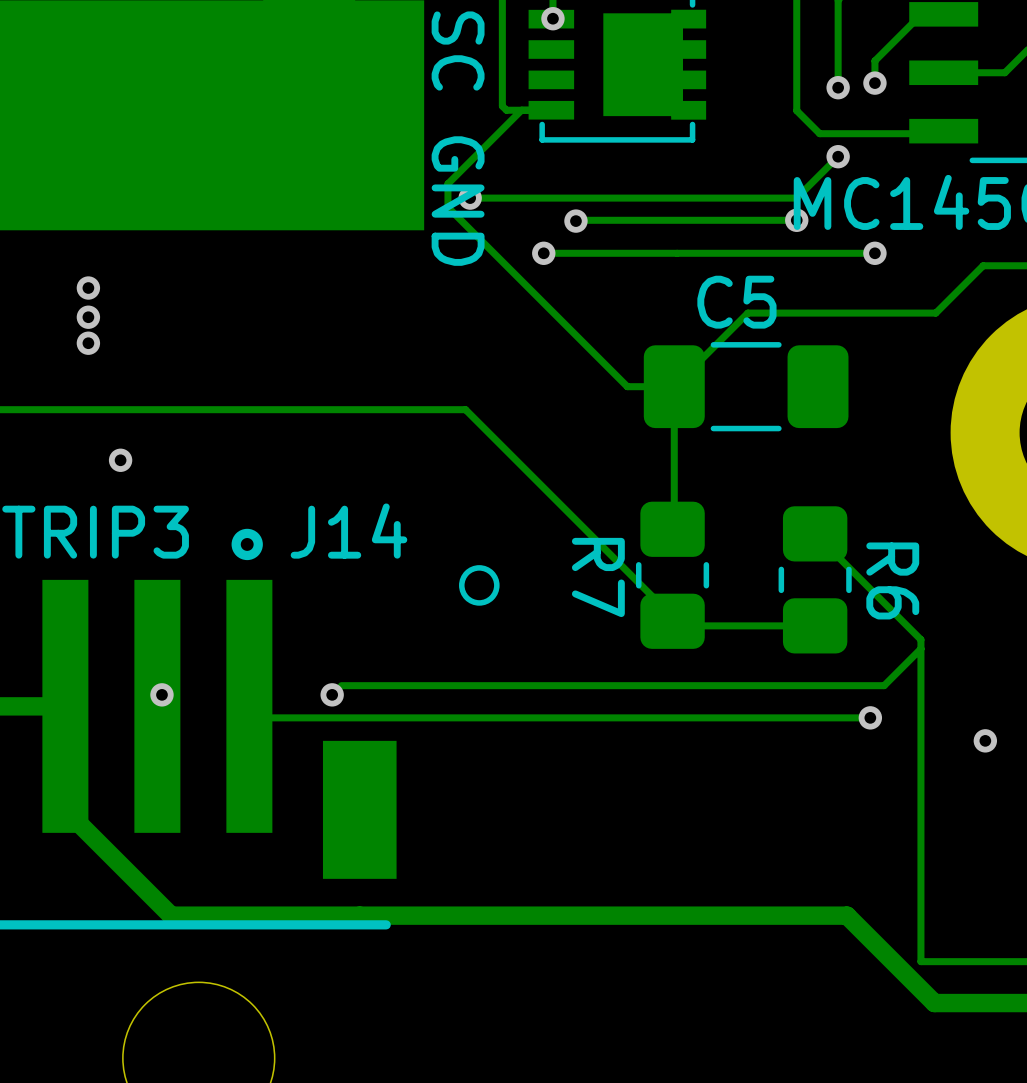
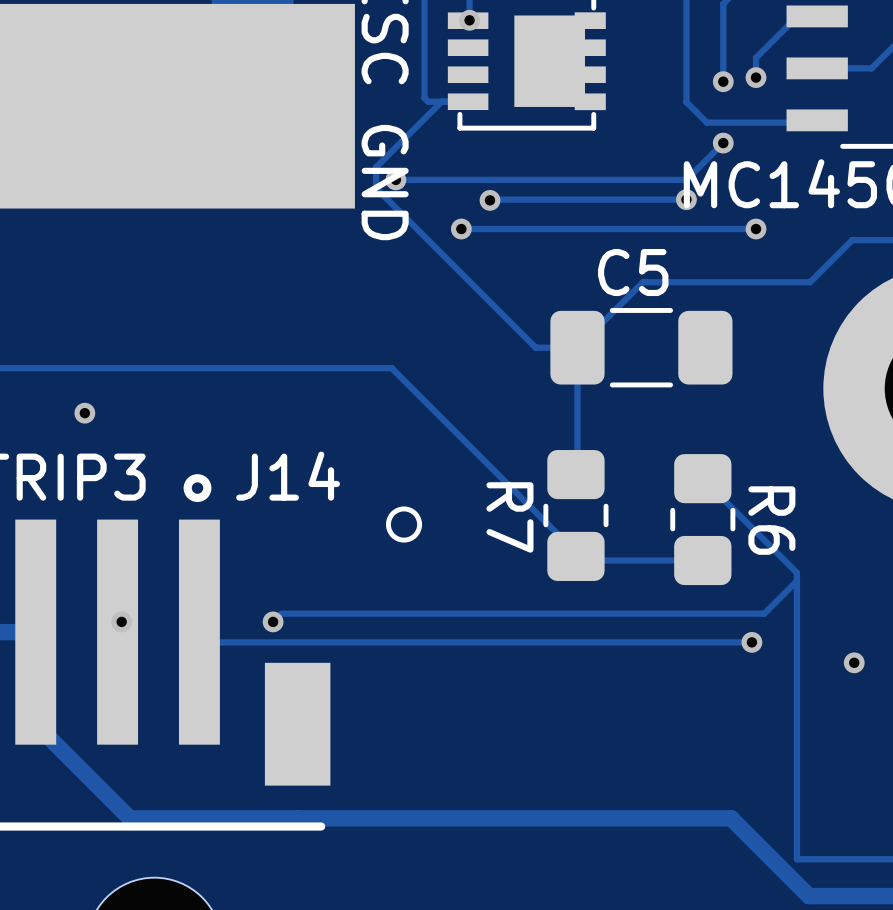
via: (88, 288) -> none
via: (88, 317) -> none
via: (88, 343) -> none

